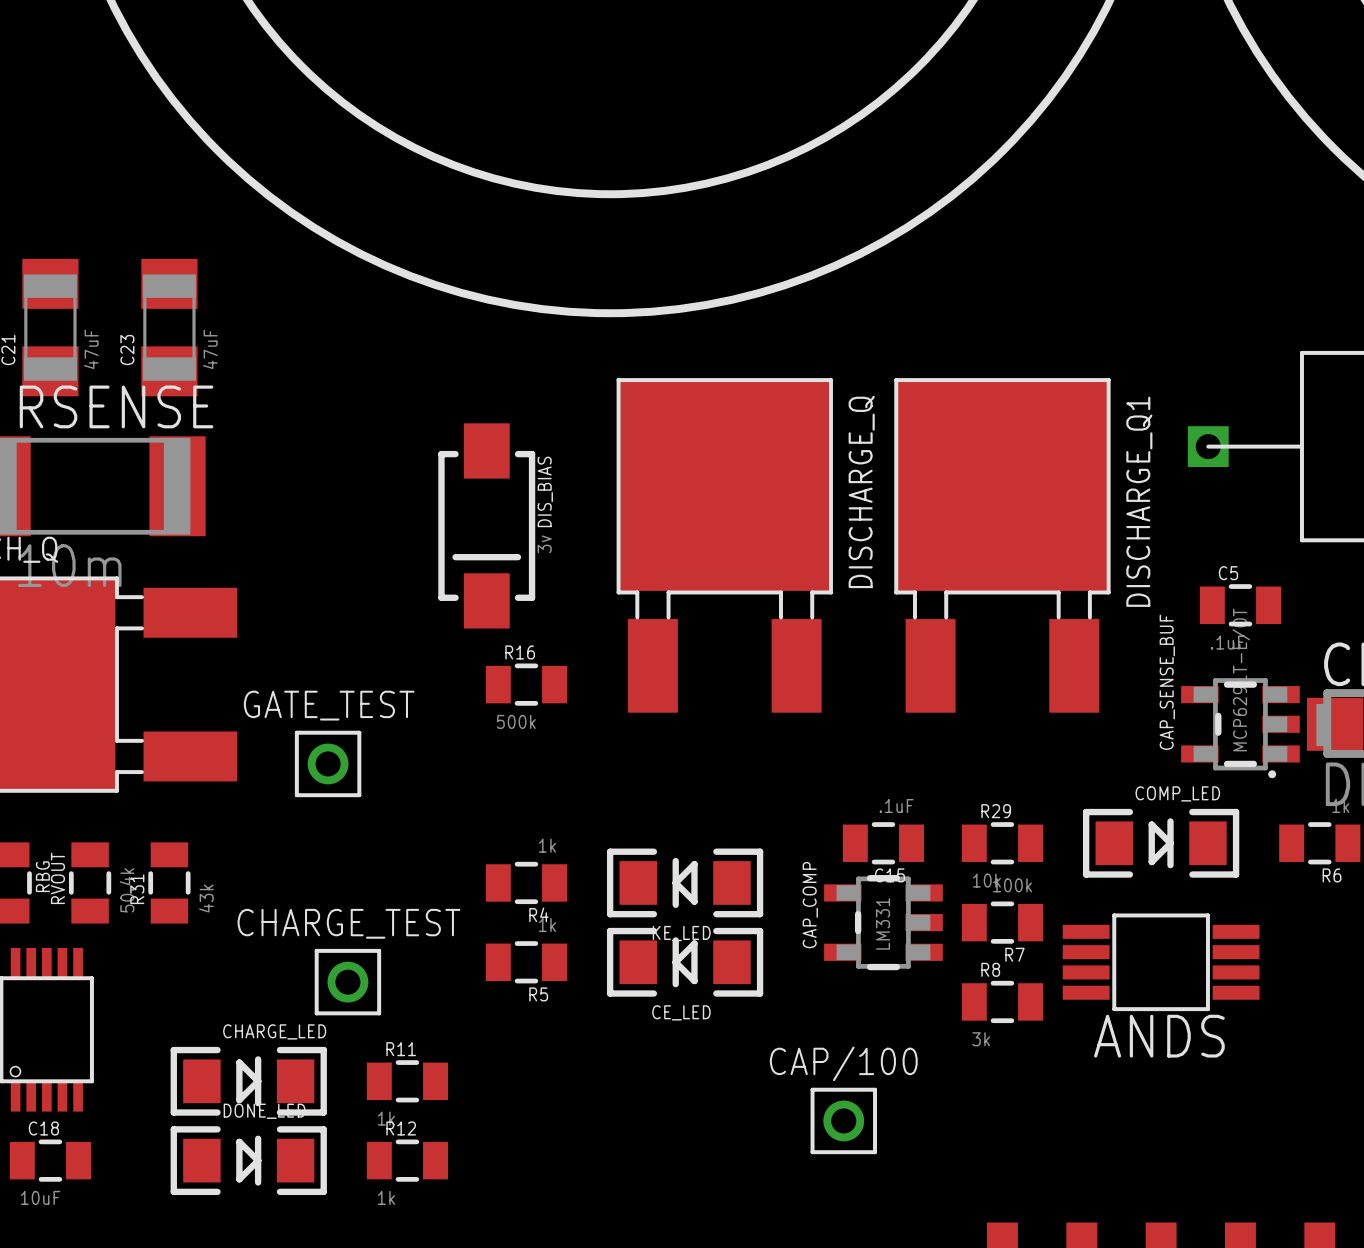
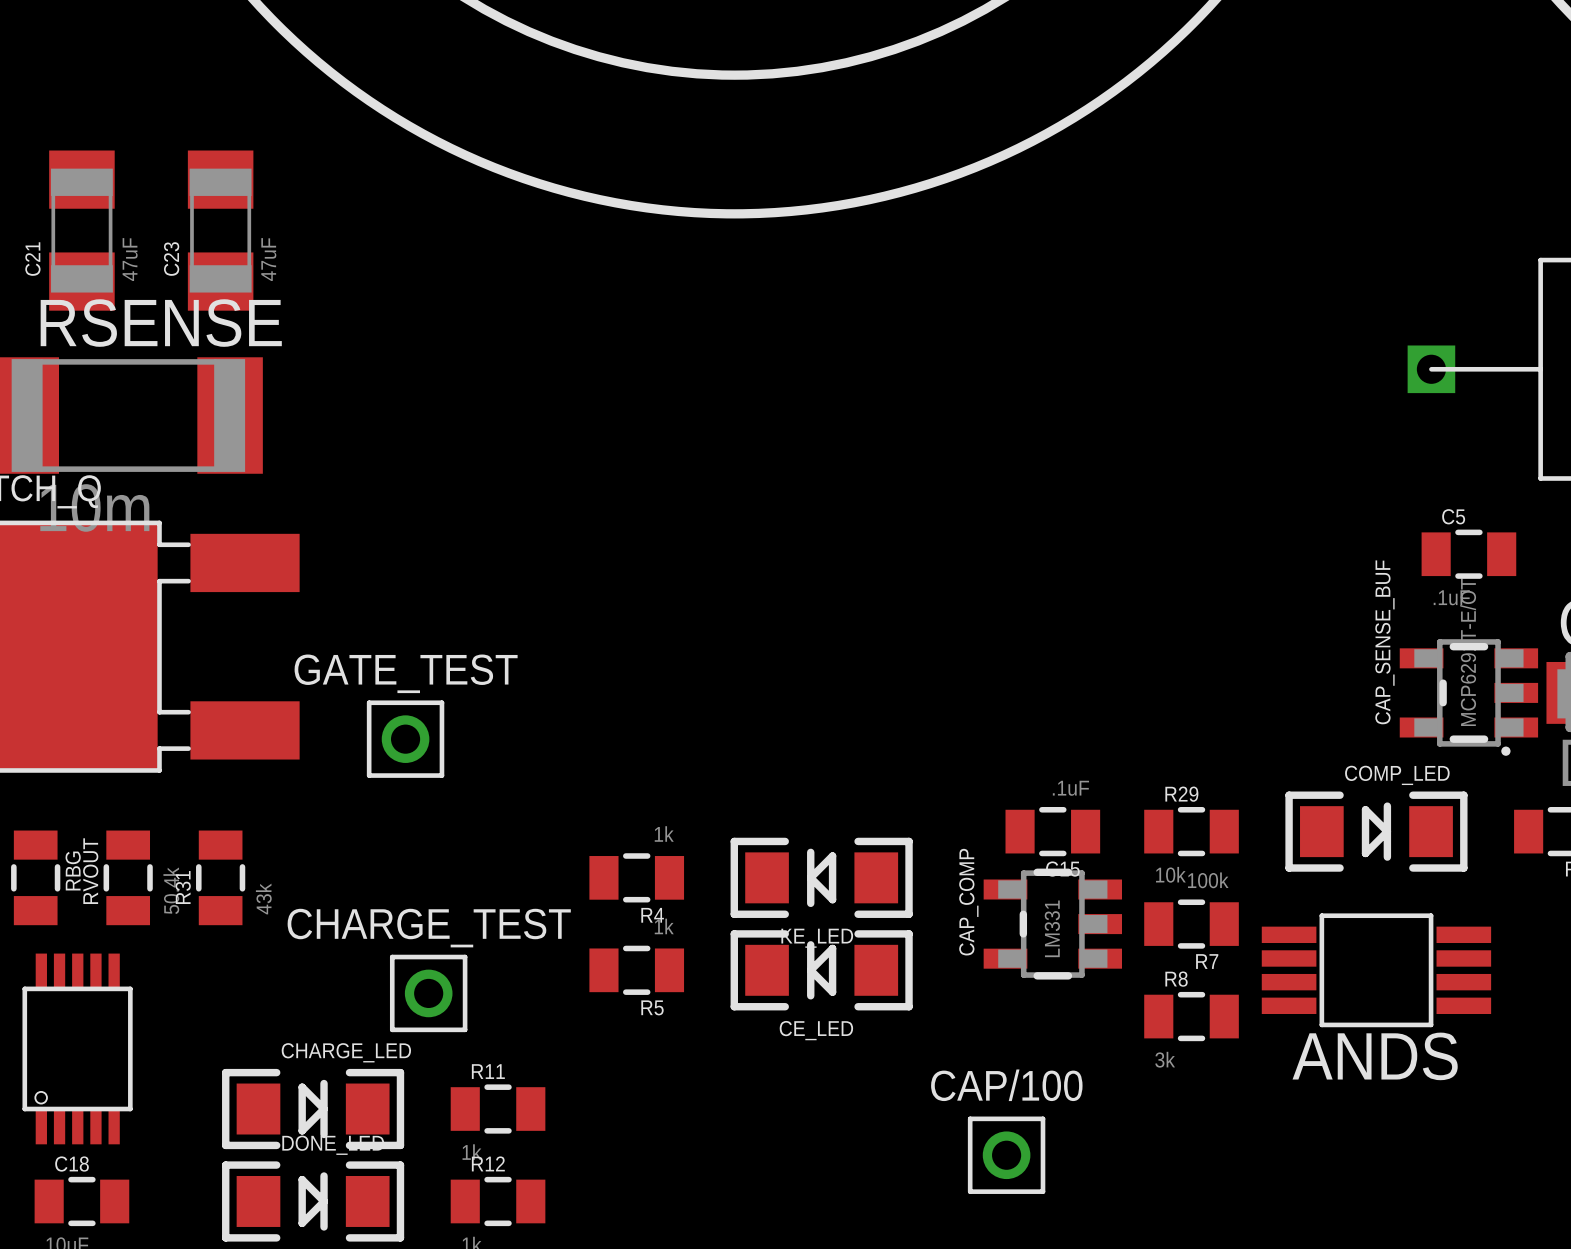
DIS_BIAS: 3v (486, 525) -> none
DISCHARGE_Q: (724, 545) -> none
DISCHARGE_Q1: (1002, 545) -> none
R16: 500k (526, 684) -> none

